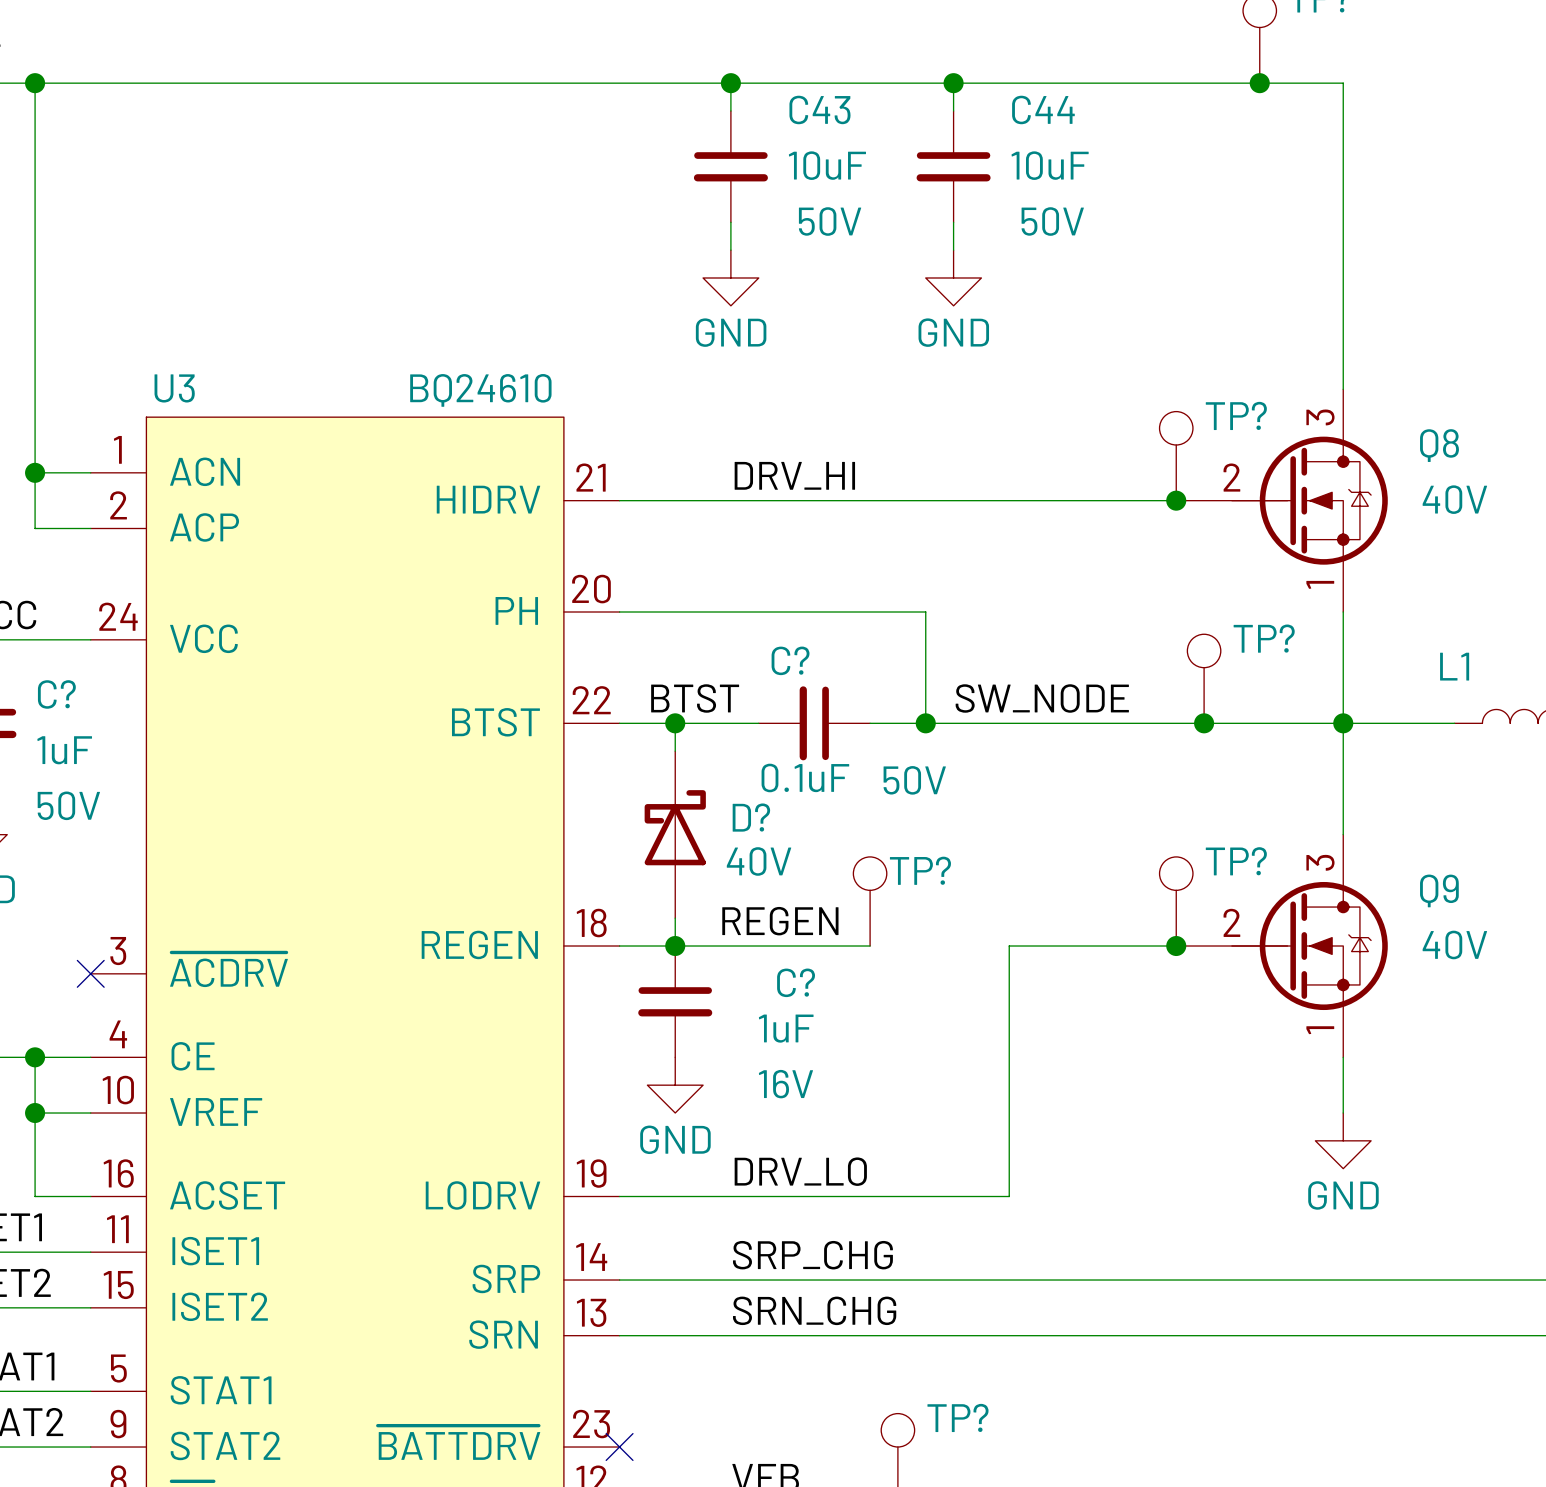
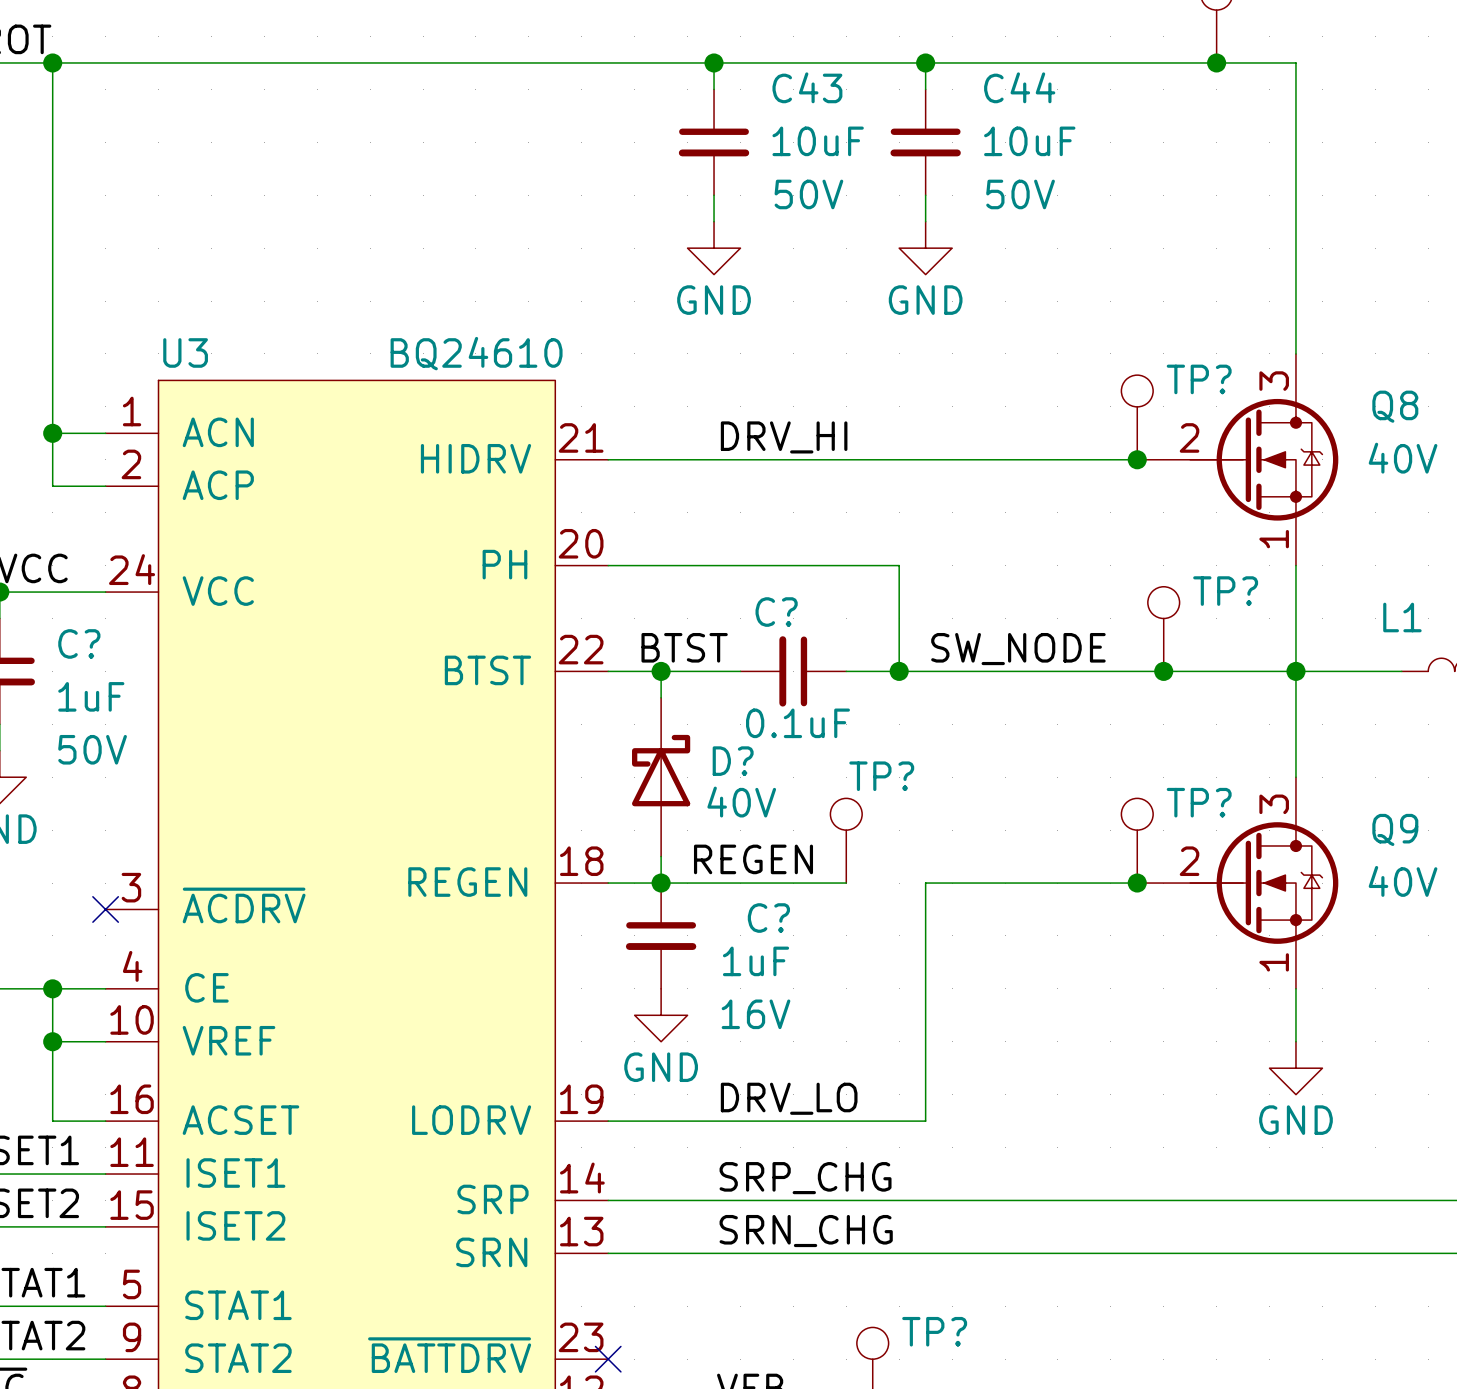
C? text: 50V (914, 780) -> none
TP? name position: TP? (920, 870) -> TP? (881, 776)
wire: (1009, 946) (1009, 1196) (953, 1196) -> (978, 883) (925, 883) (925, 1121)

